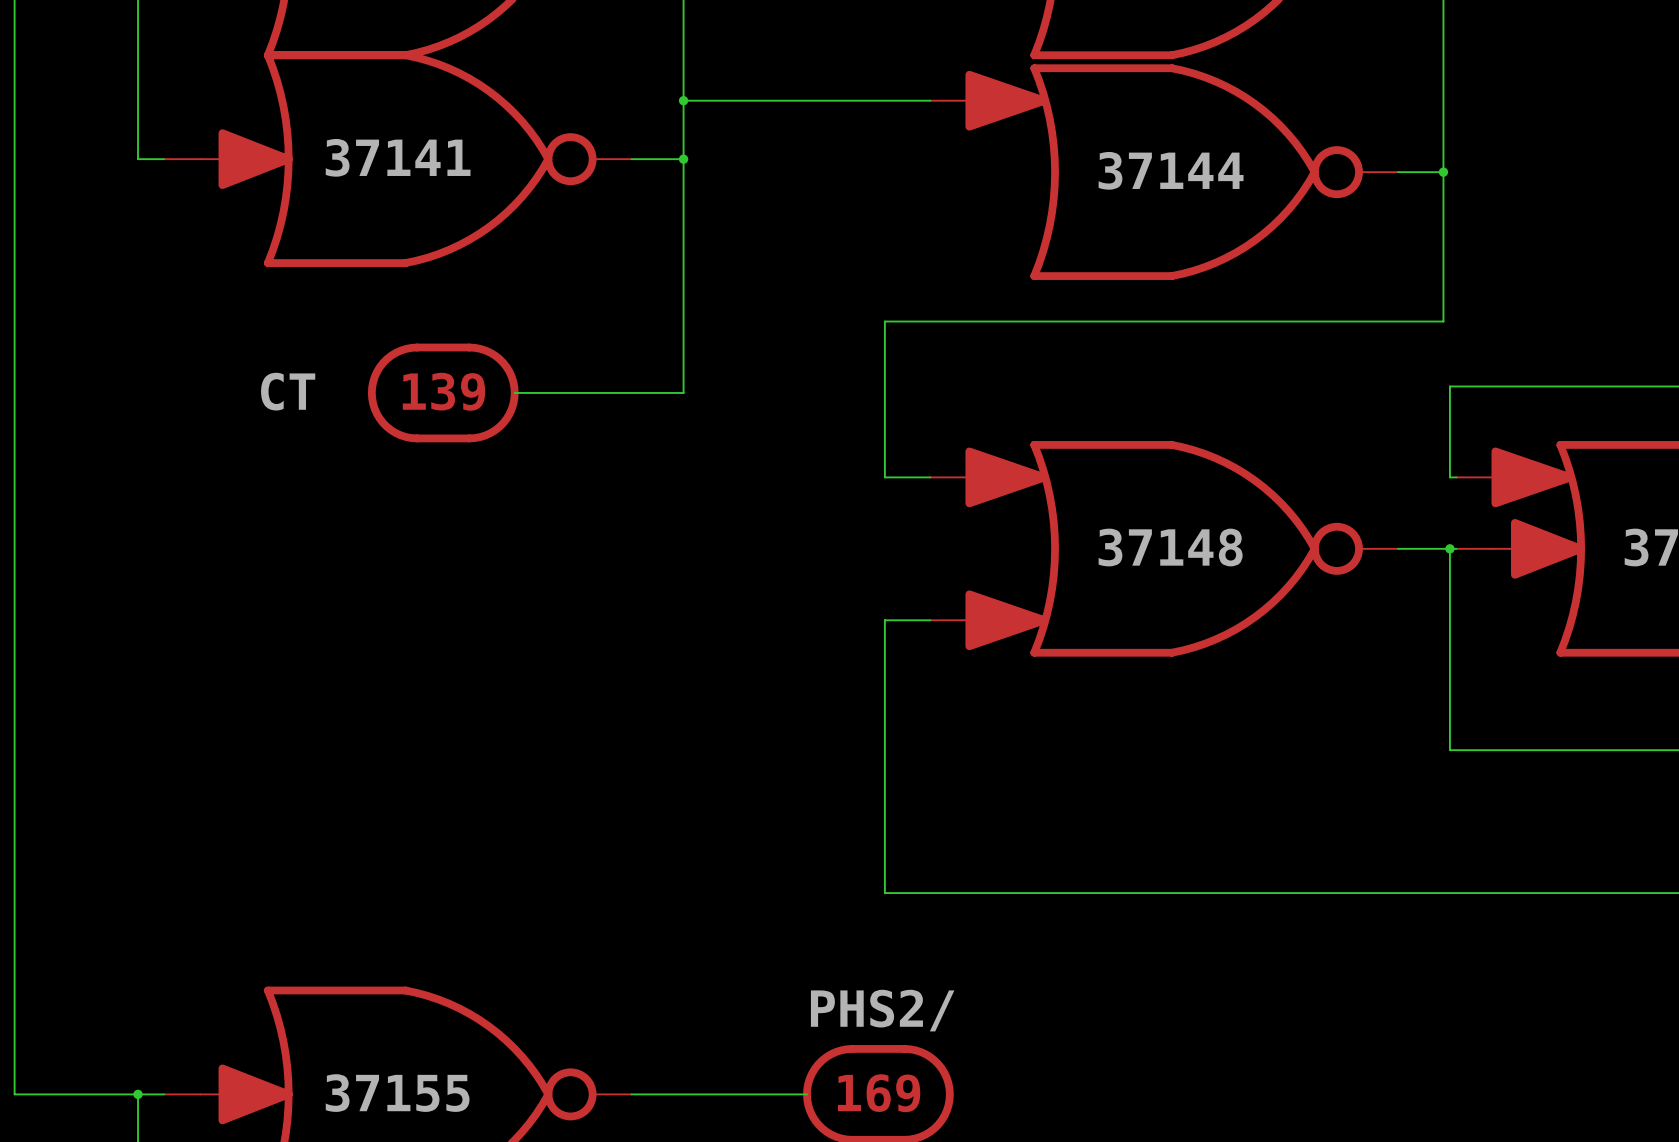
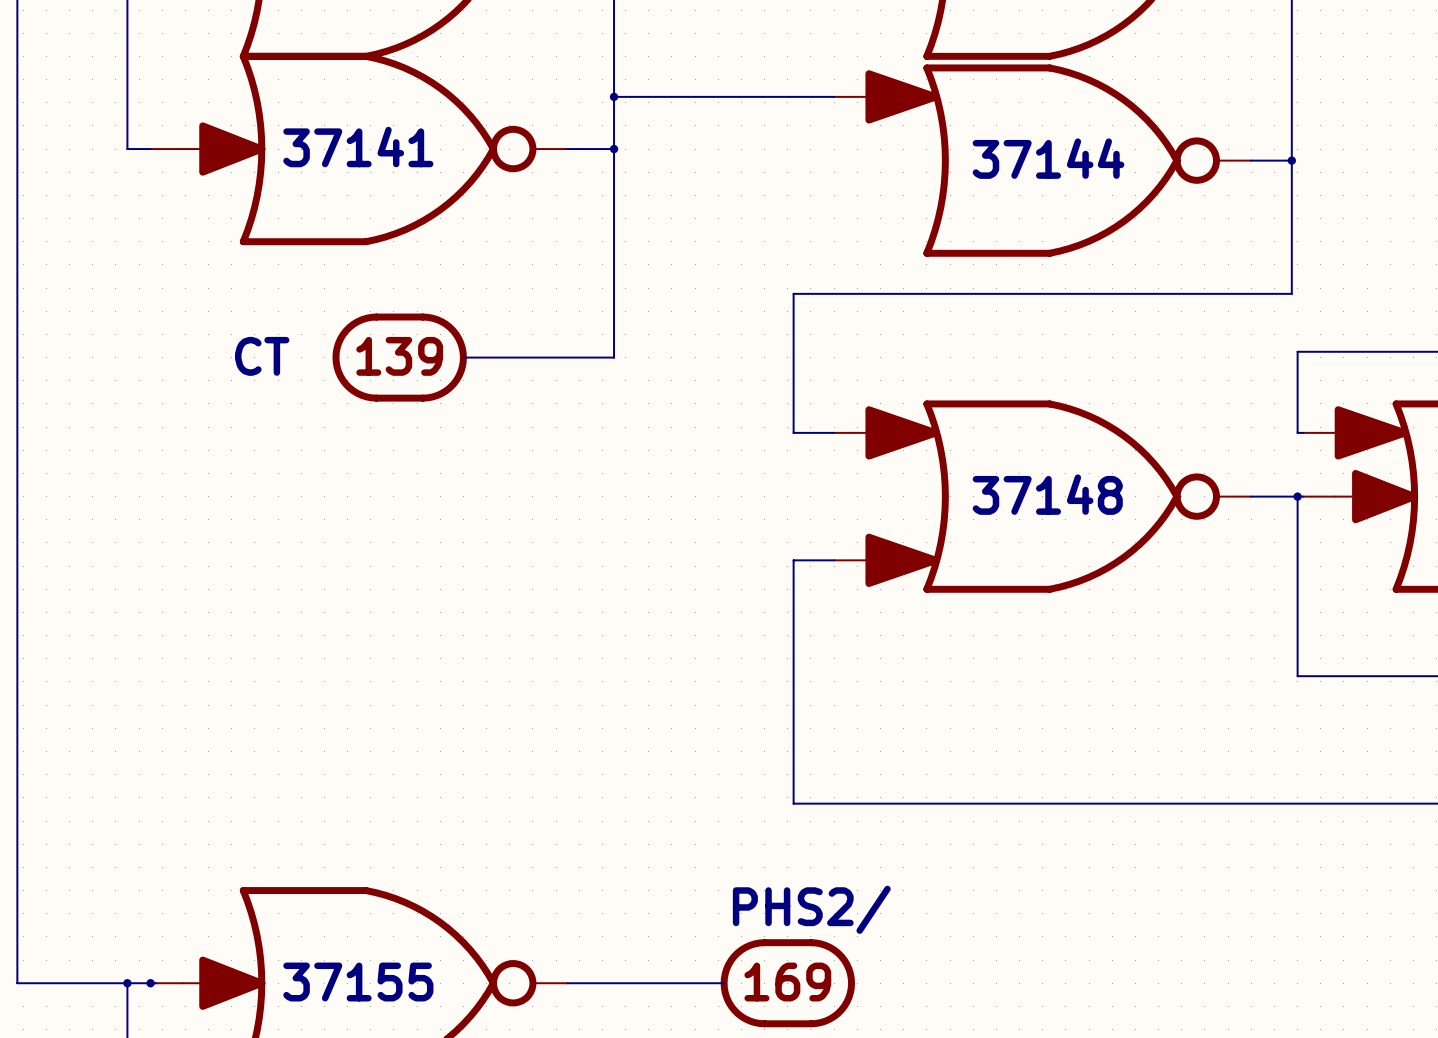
junction: none -> (150, 983)

